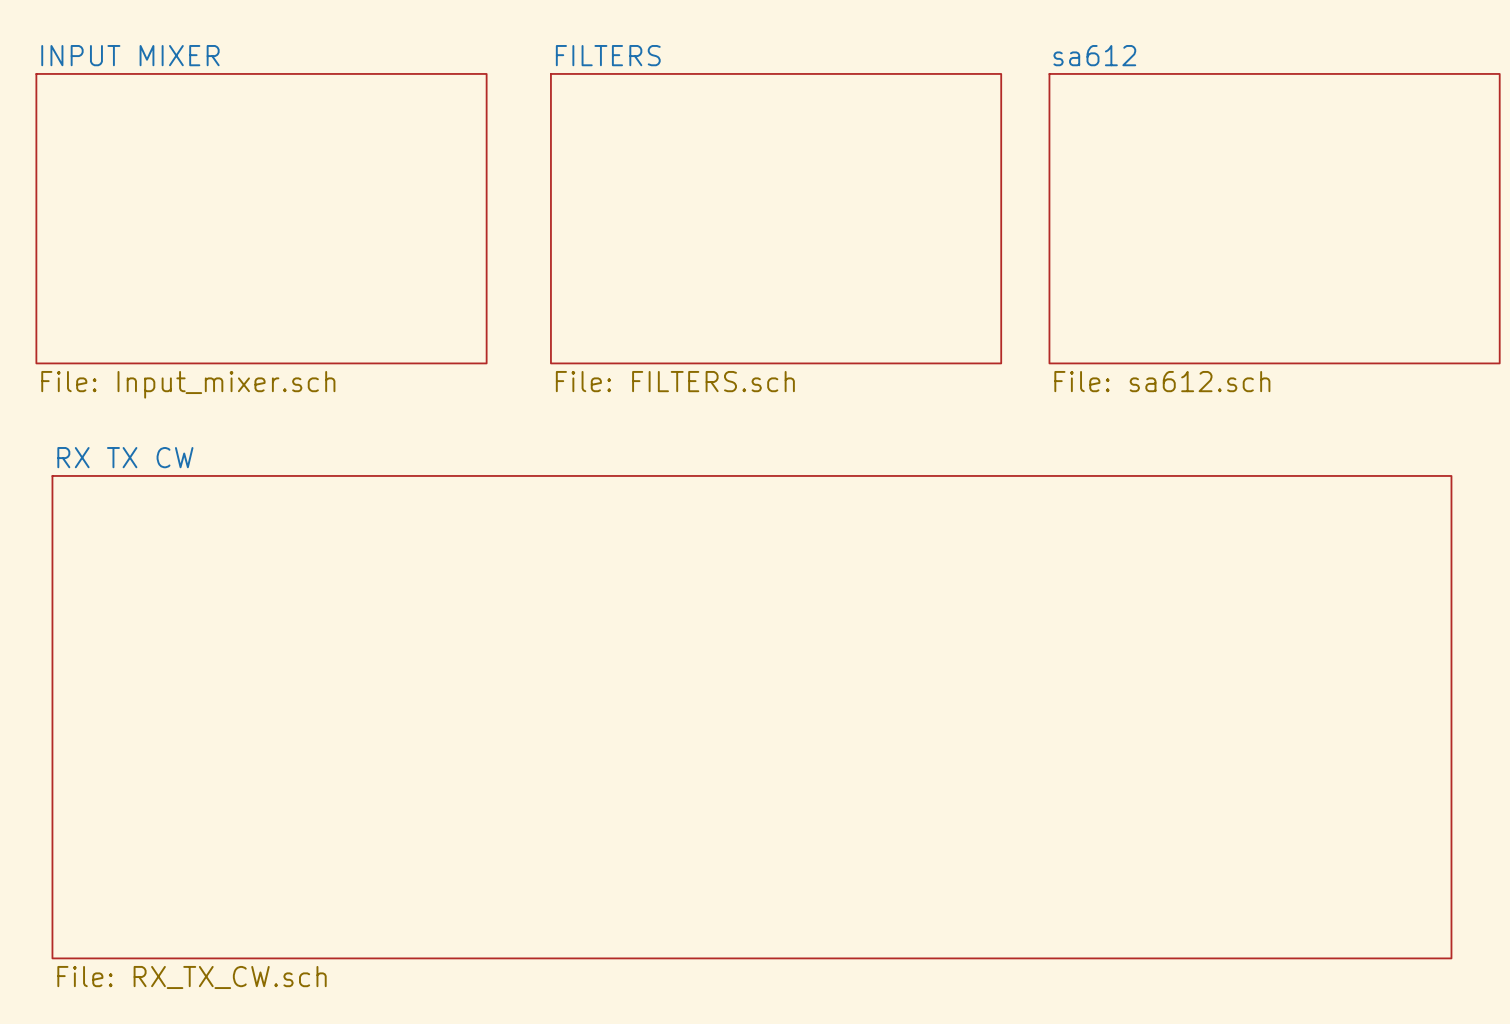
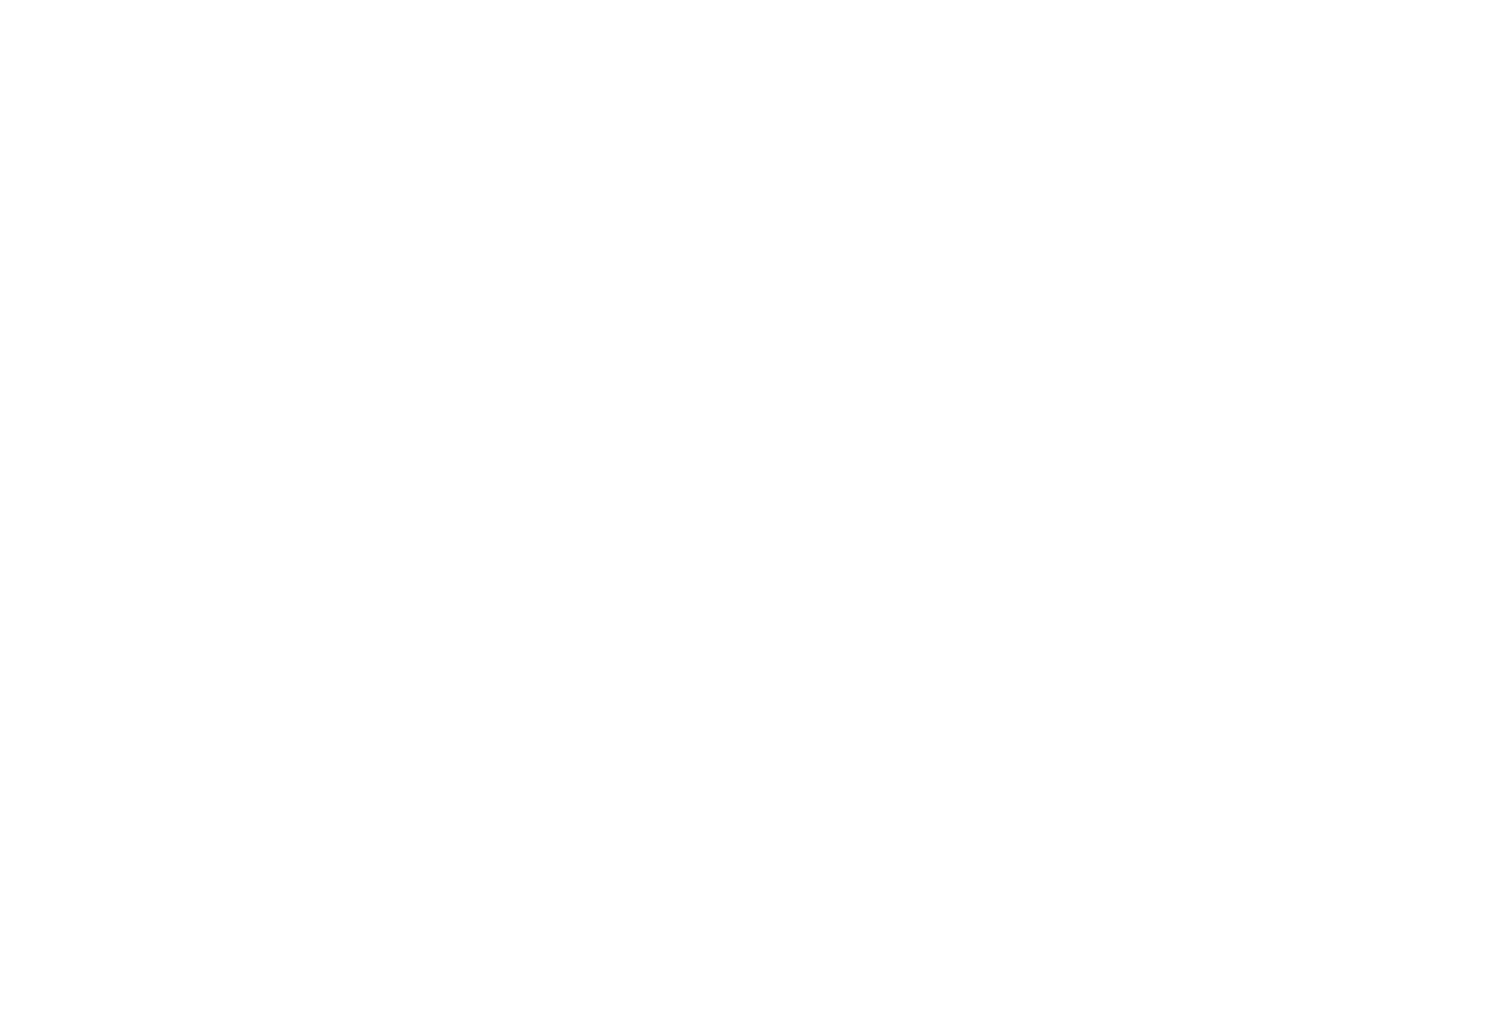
sheet INPUT MIXER: File: Input_mixer.sch (261, 218) -> none
sheet FILTERS: File: FILTERS.sch (776, 218) -> none
sheet sa612: File: sa612.sch (1274, 218) -> none
sheet RX TX CW: File: RX_TX_CW.sch (751, 717) -> none

